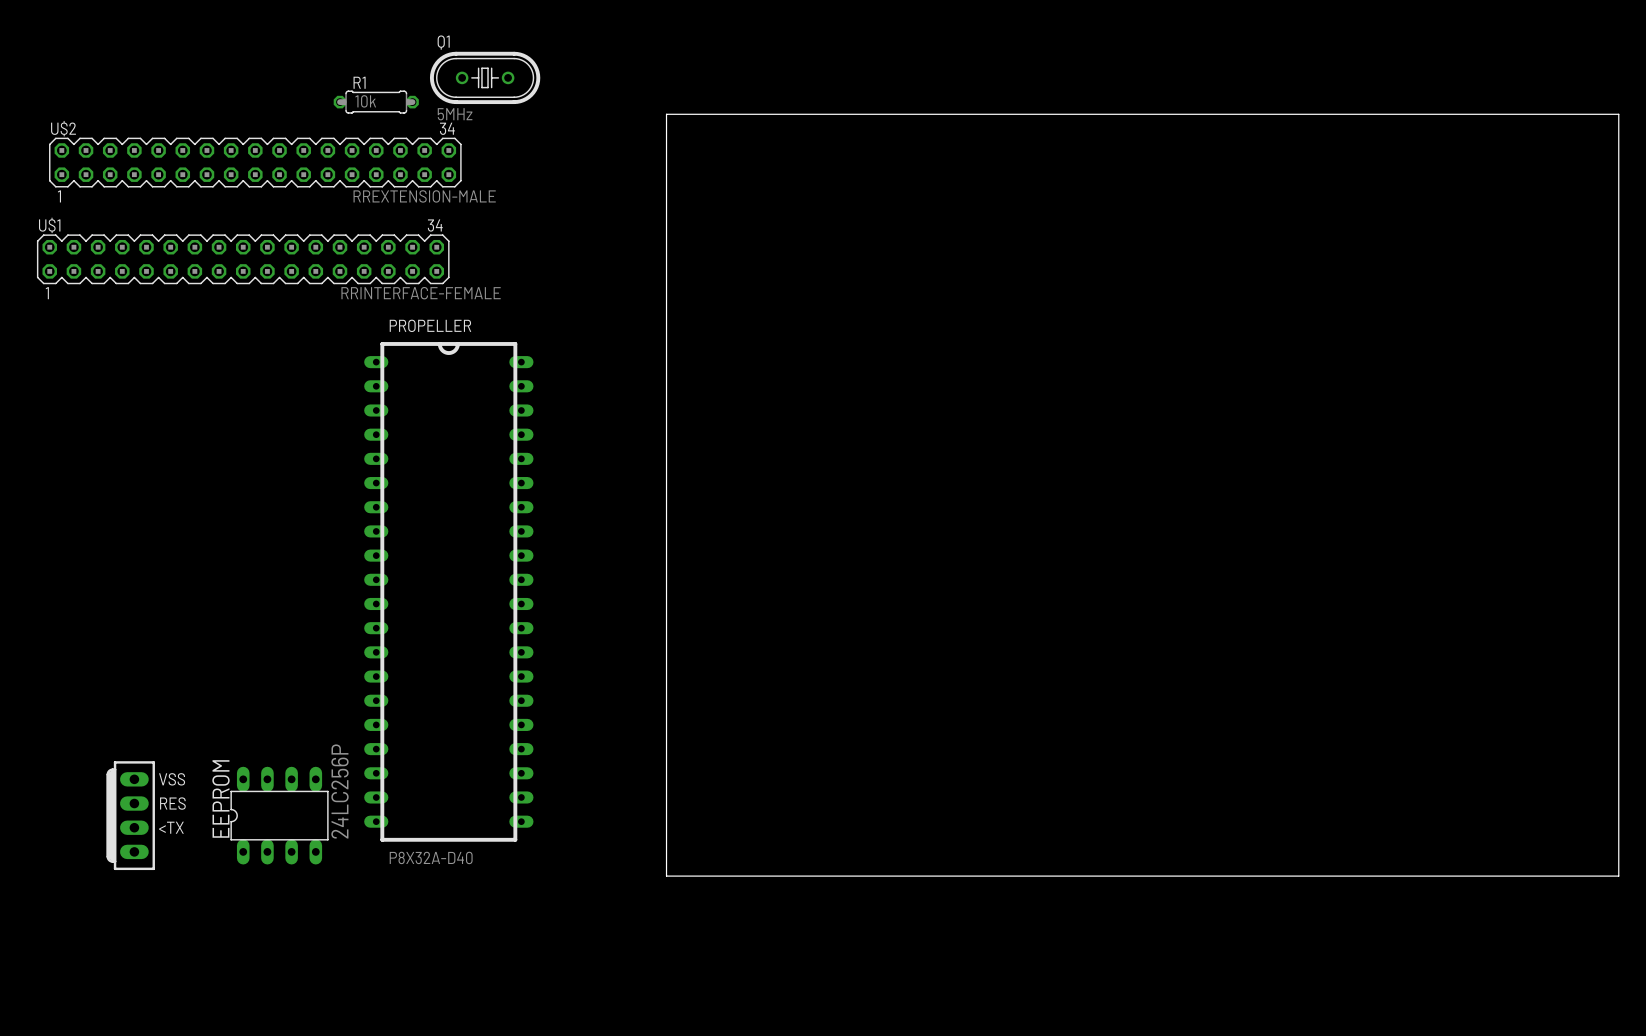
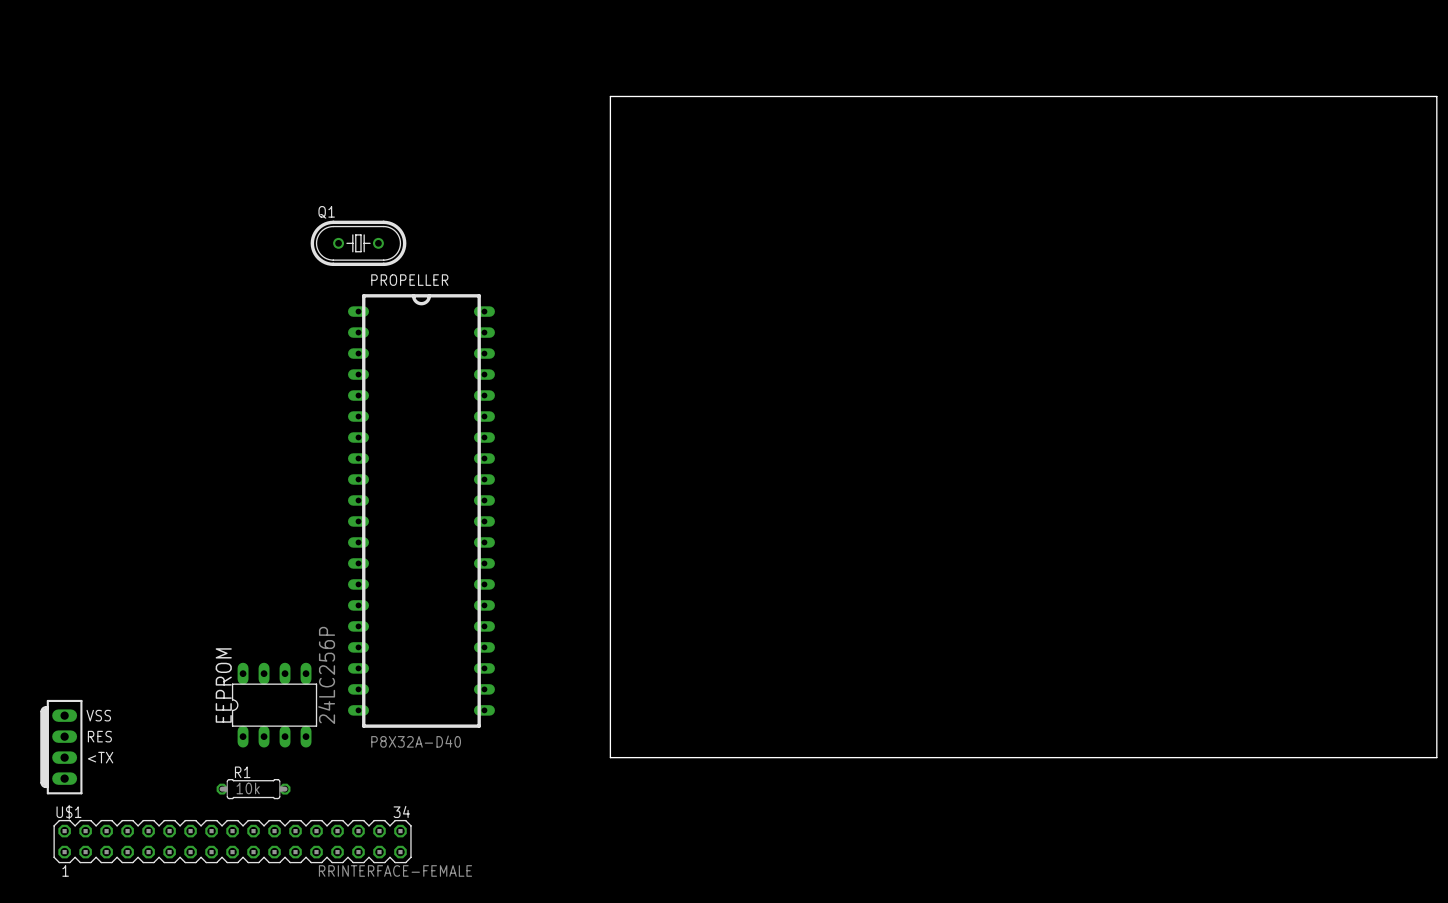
Q1 position: (485, 77) -> (358, 243)
R1 position: (376, 102) -> (253, 789)
Q1 value: 5MHz (455, 114) -> none
U$2: RREXTENSION-MALE (255, 162) -> none
U$1 position: (243, 259) -> (232, 841)
part position: (130, 815) -> (61, 747)

